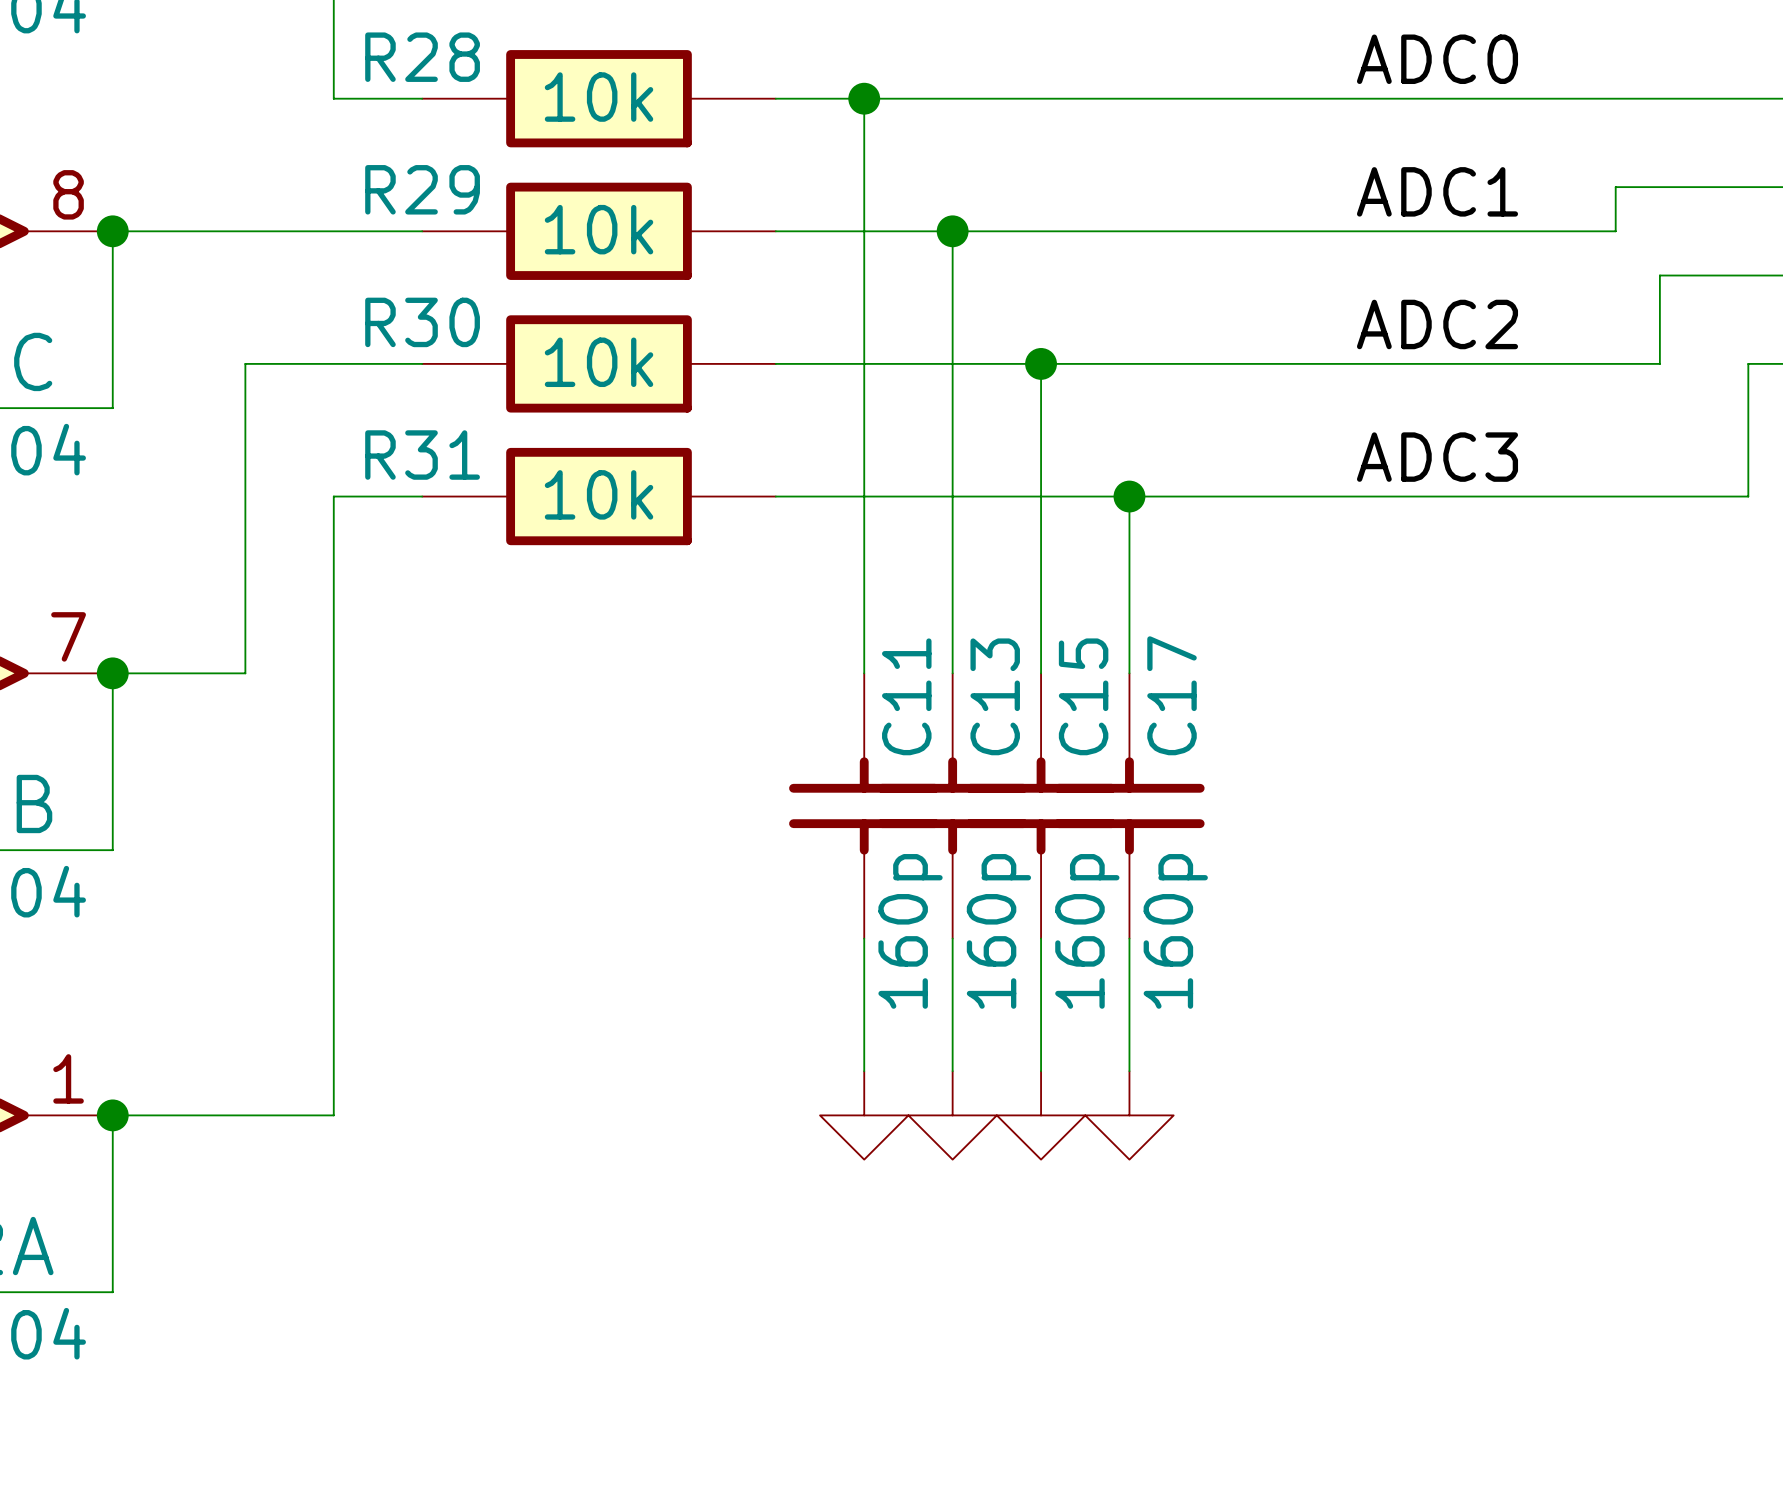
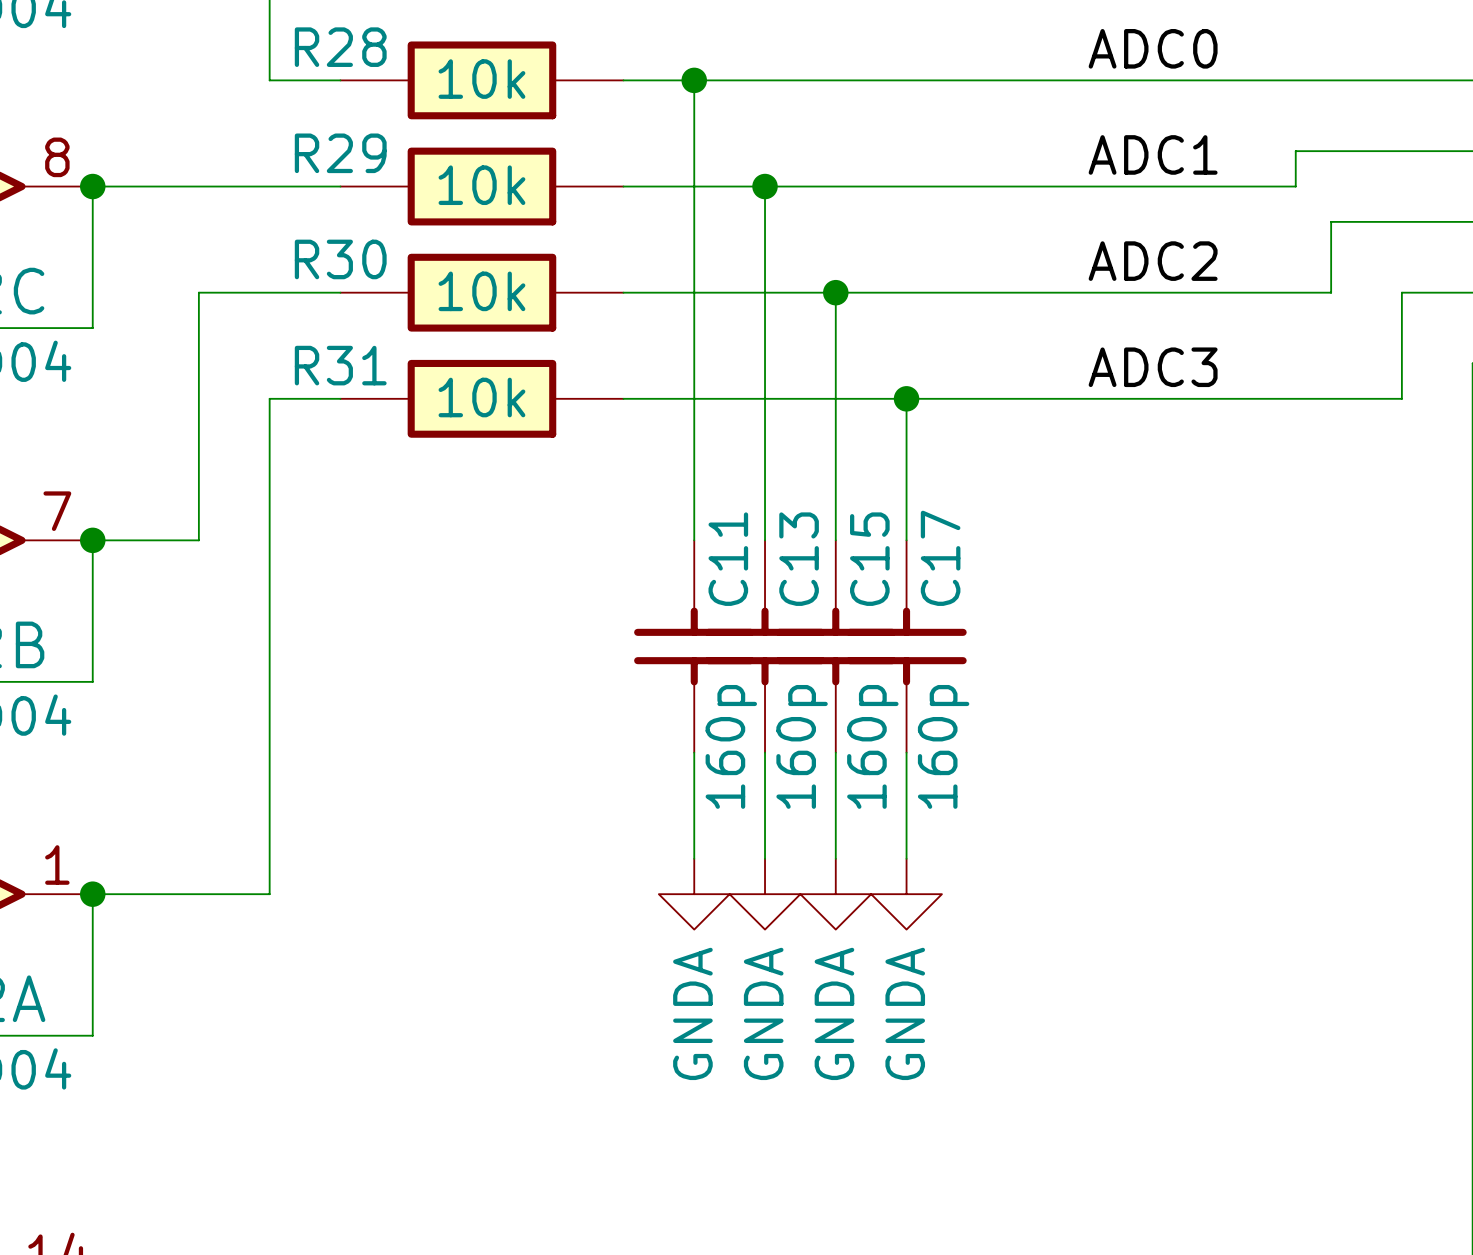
power symbol text: none -> GNDA (692, 1013)
power symbol text: none -> GNDA (763, 1013)
power symbol text: none -> GNDA (834, 1013)
power symbol text: none -> GNDA (905, 1013)

